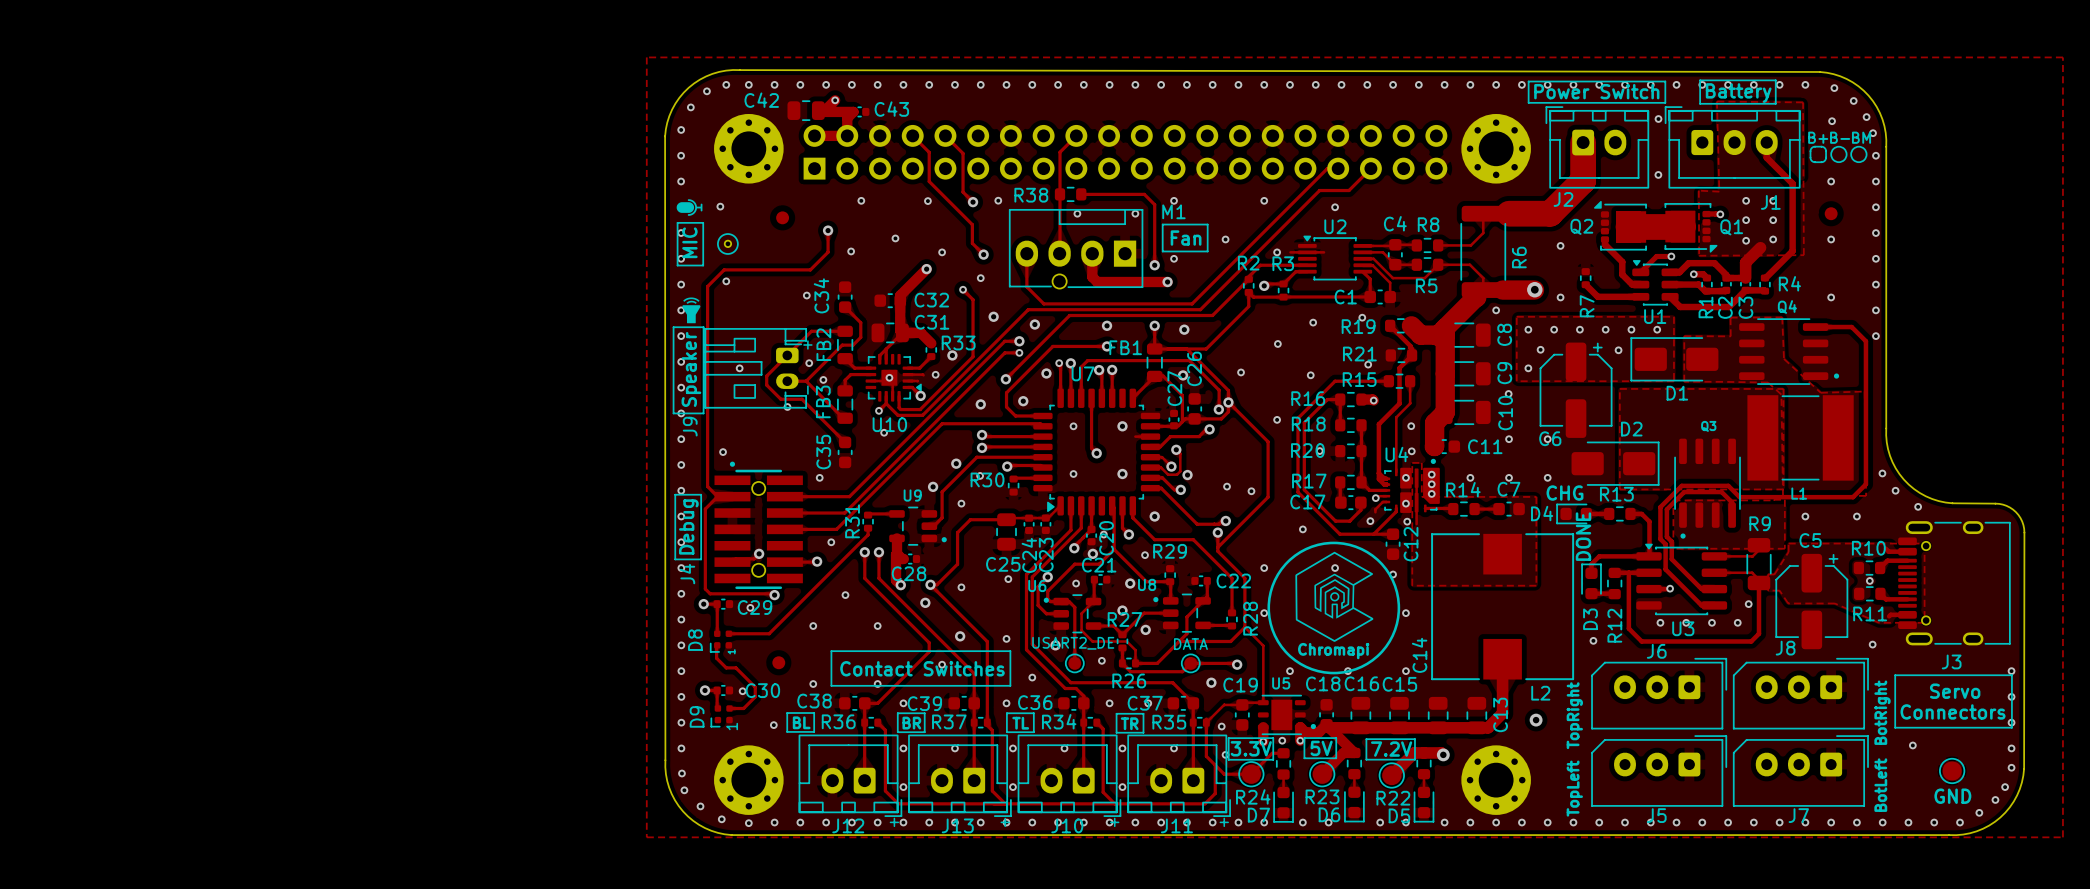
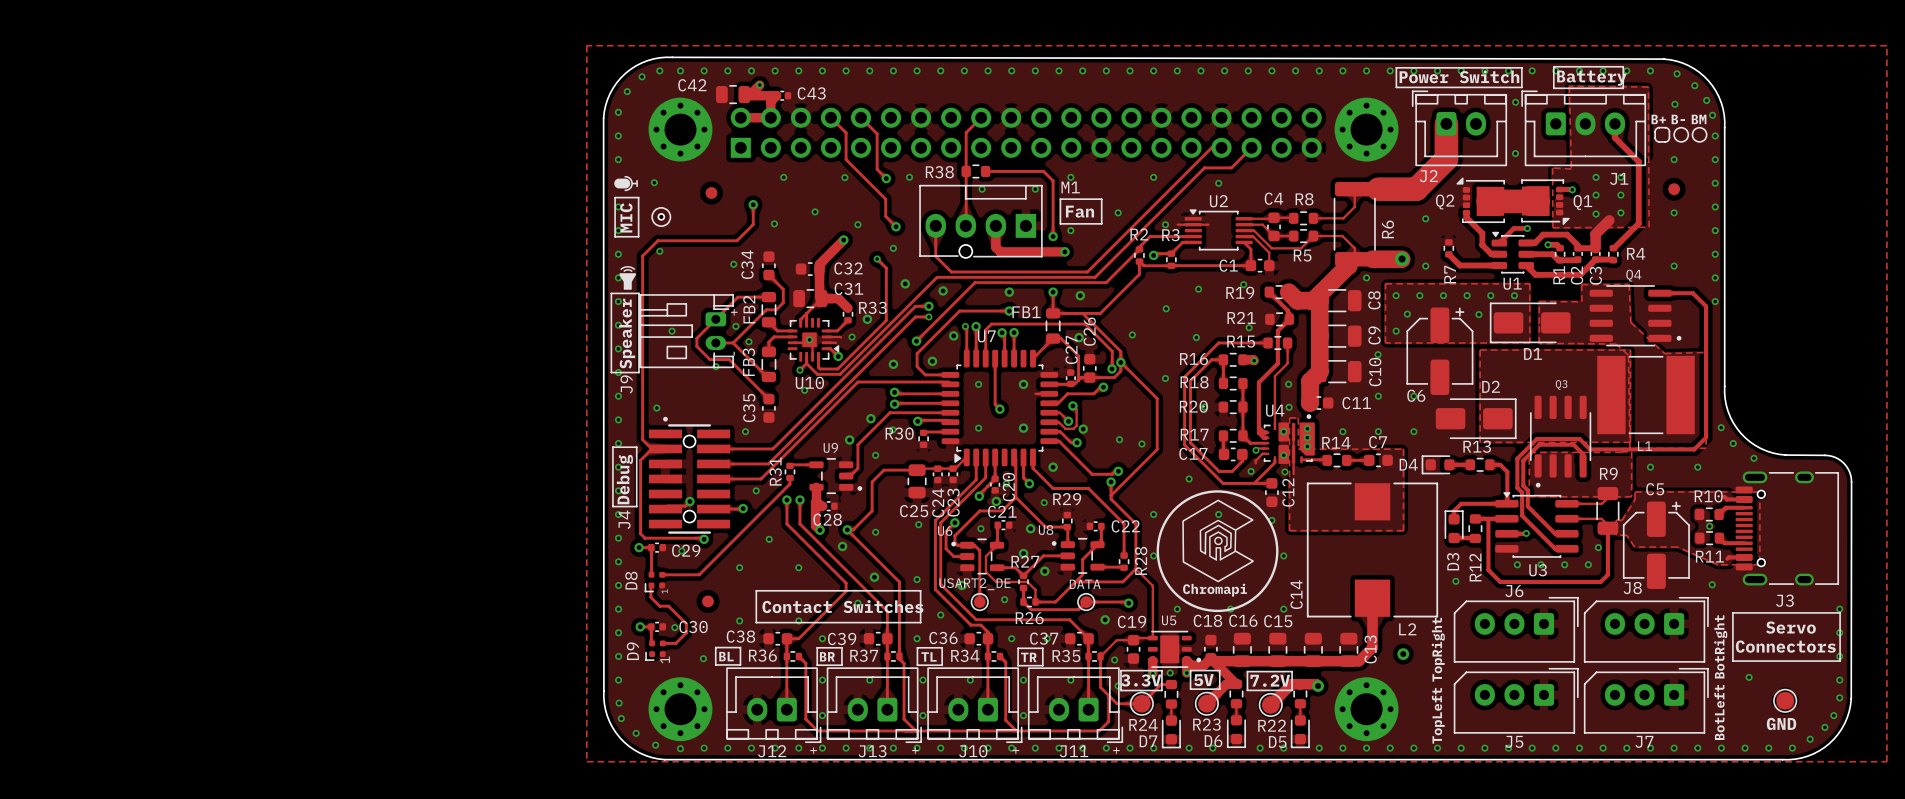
text: CHG (1564, 493) -> none
text: DONE (1583, 536) -> none

